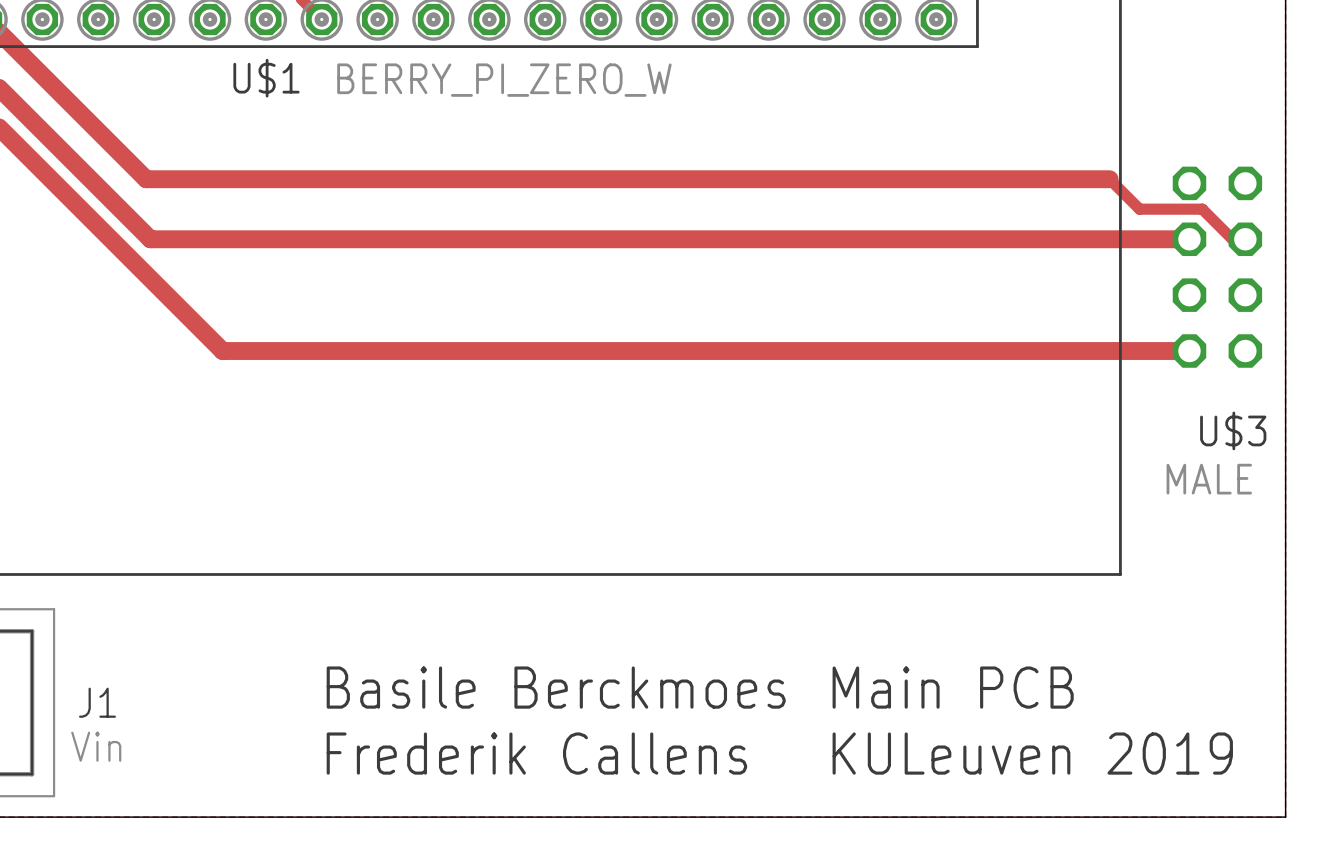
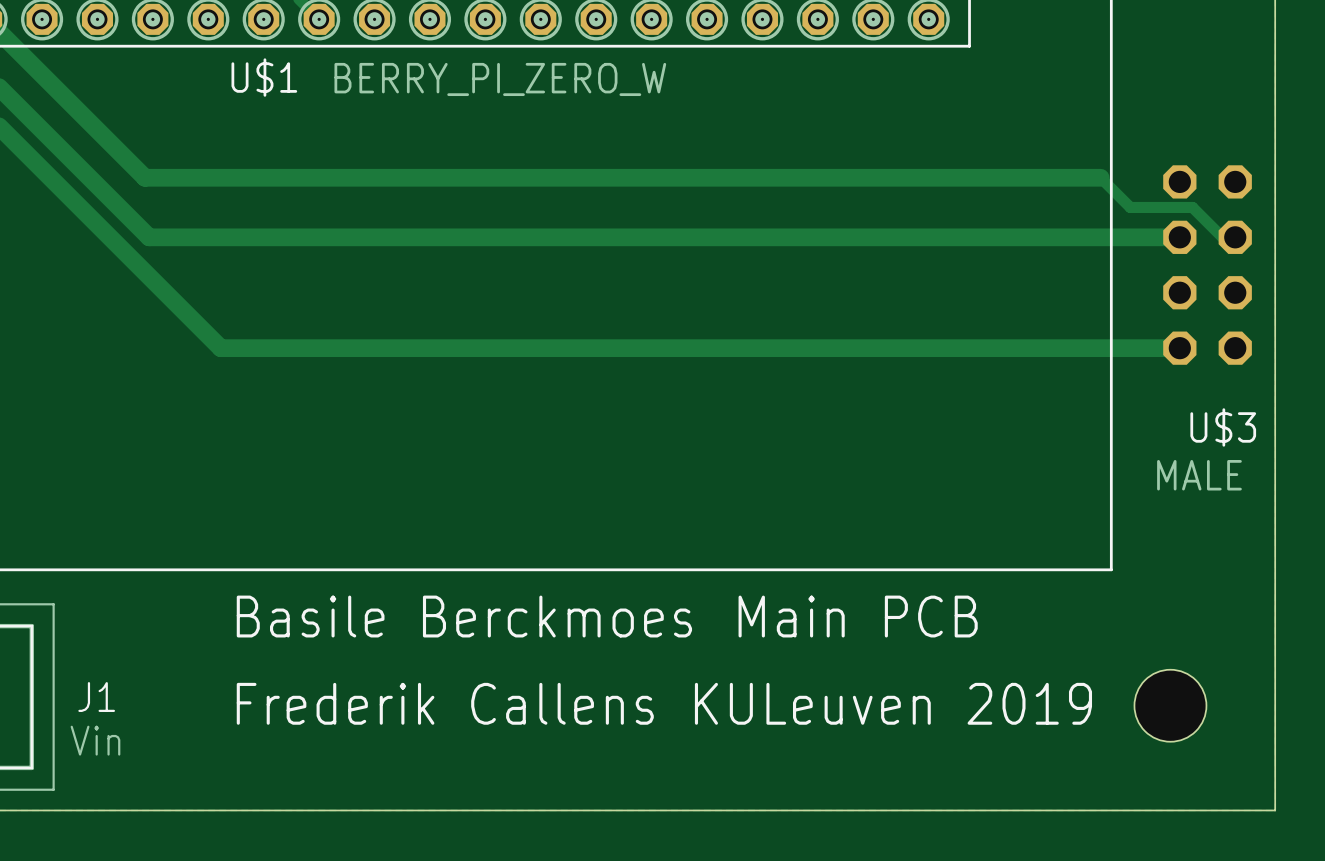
text position: Basile Berckmoes (556, 687) -> Basile Berckmoes (464, 616)
text position: Main PCB (953, 687) -> Main PCB (858, 616)
hole: none -> (1170, 705)
text position: Frederik Callens (536, 753) -> Frederik Callens (445, 703)
text position: KULeuven 2019 (1032, 753) -> KULeuven 2019 (893, 703)

